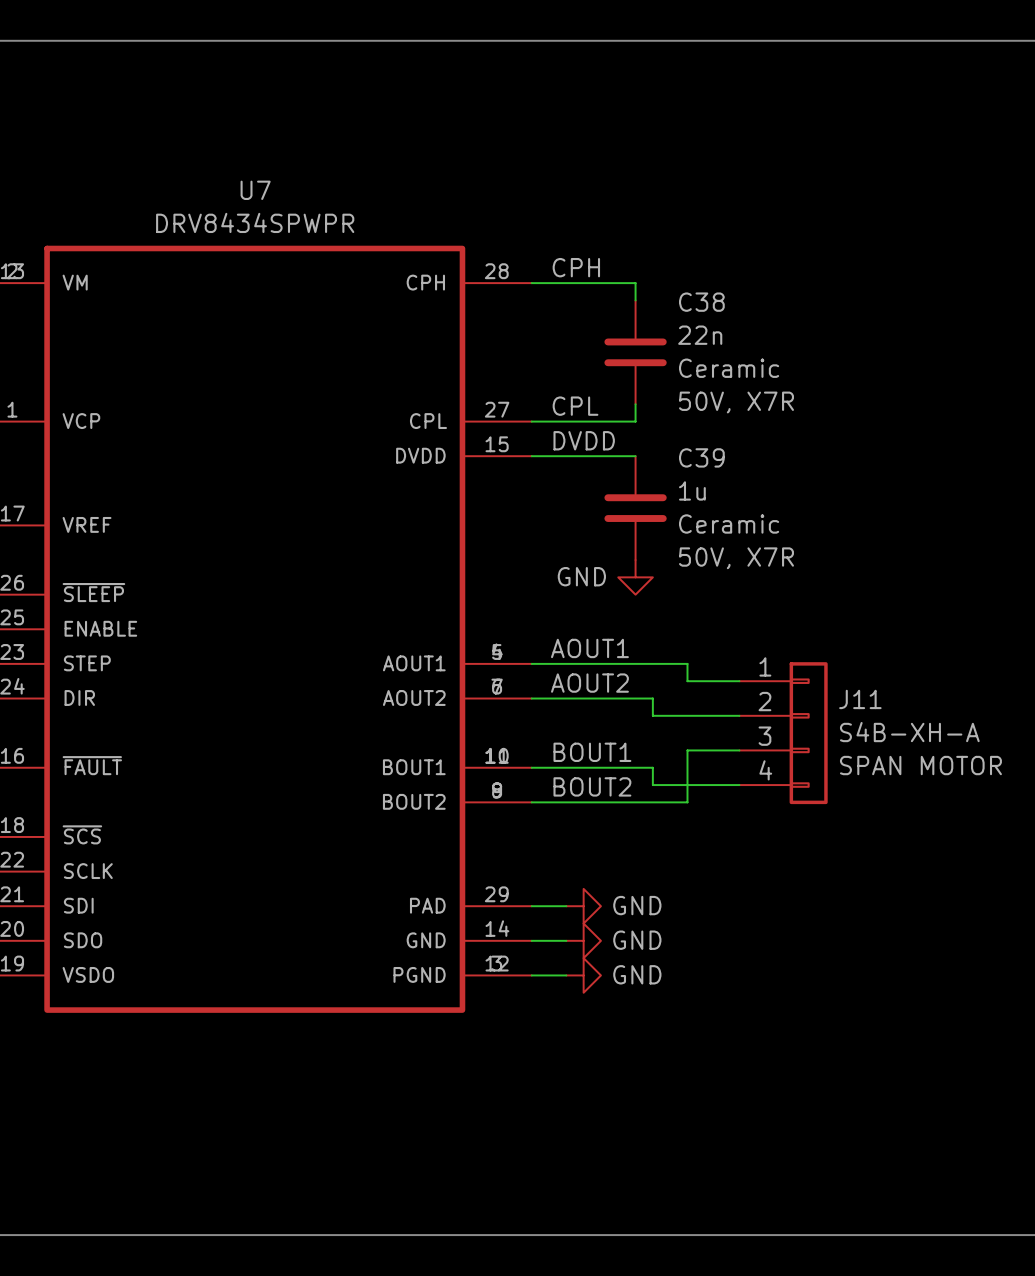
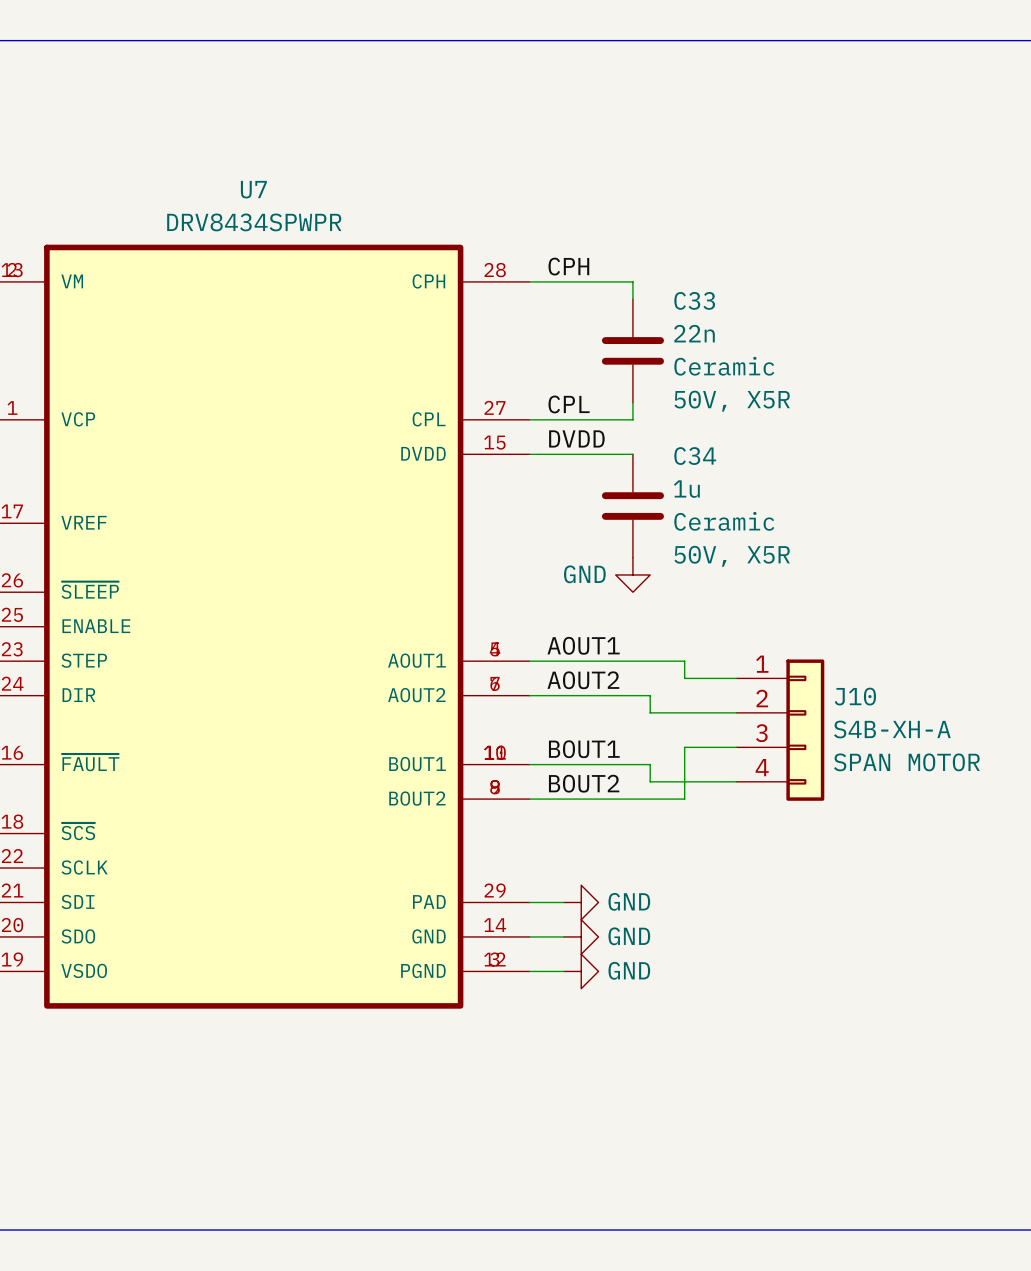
C38 name: C38 (701, 302) -> C33 (694, 300)
C38 text: 50V, X7R (736, 402) -> 50V, X5R (732, 401)
C39 name: C39 (701, 457) -> C34 (695, 456)
C39 text: 50V, X7R (736, 558) -> 50V, X5R (732, 556)
J11 name: J11 (860, 699) -> J10 (855, 696)

